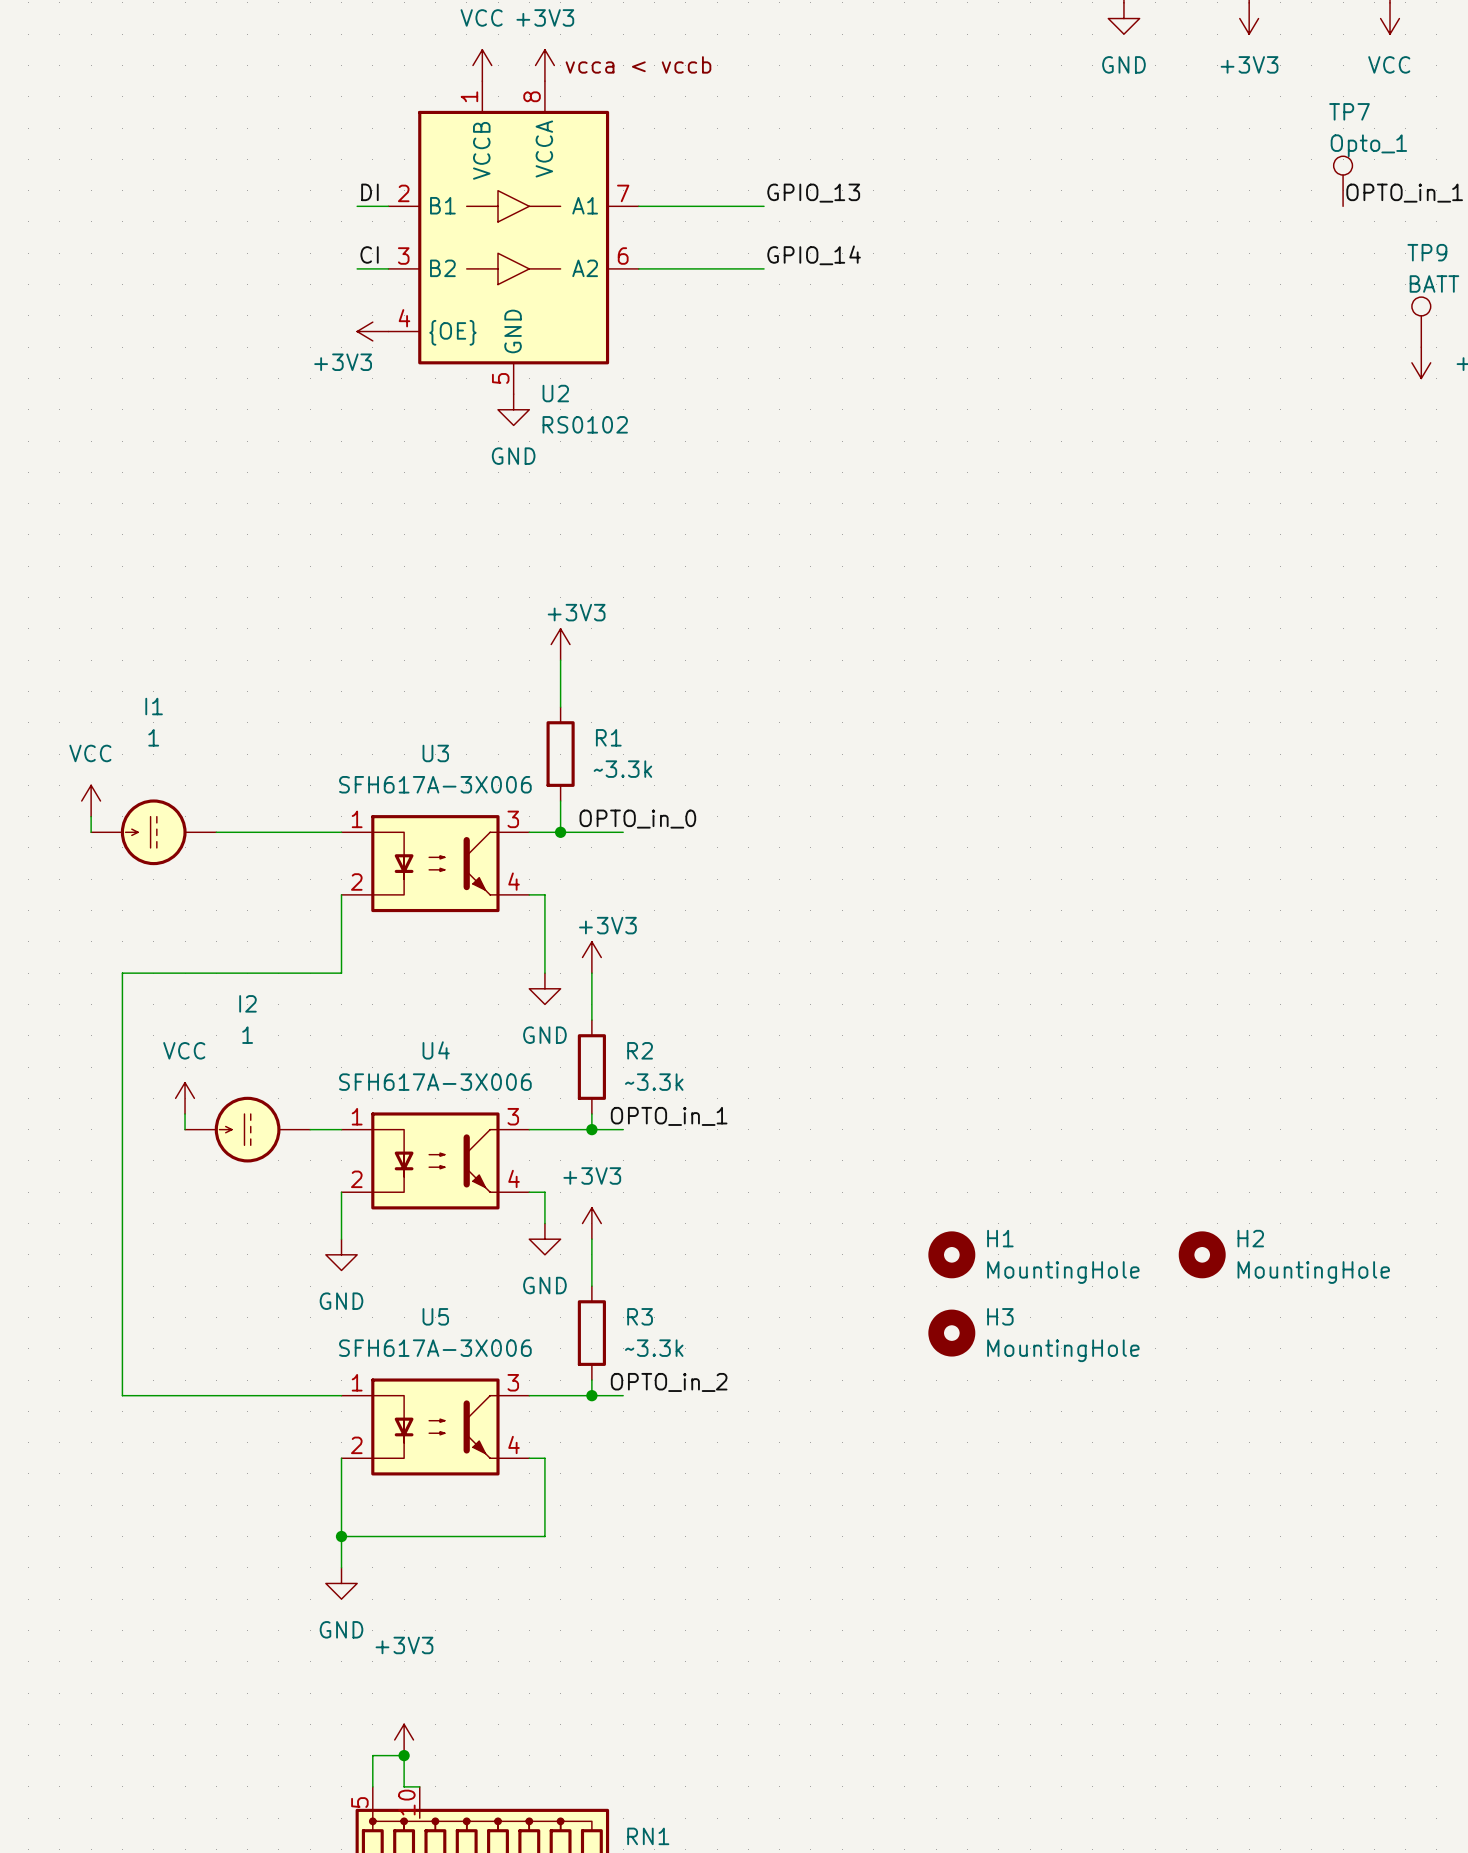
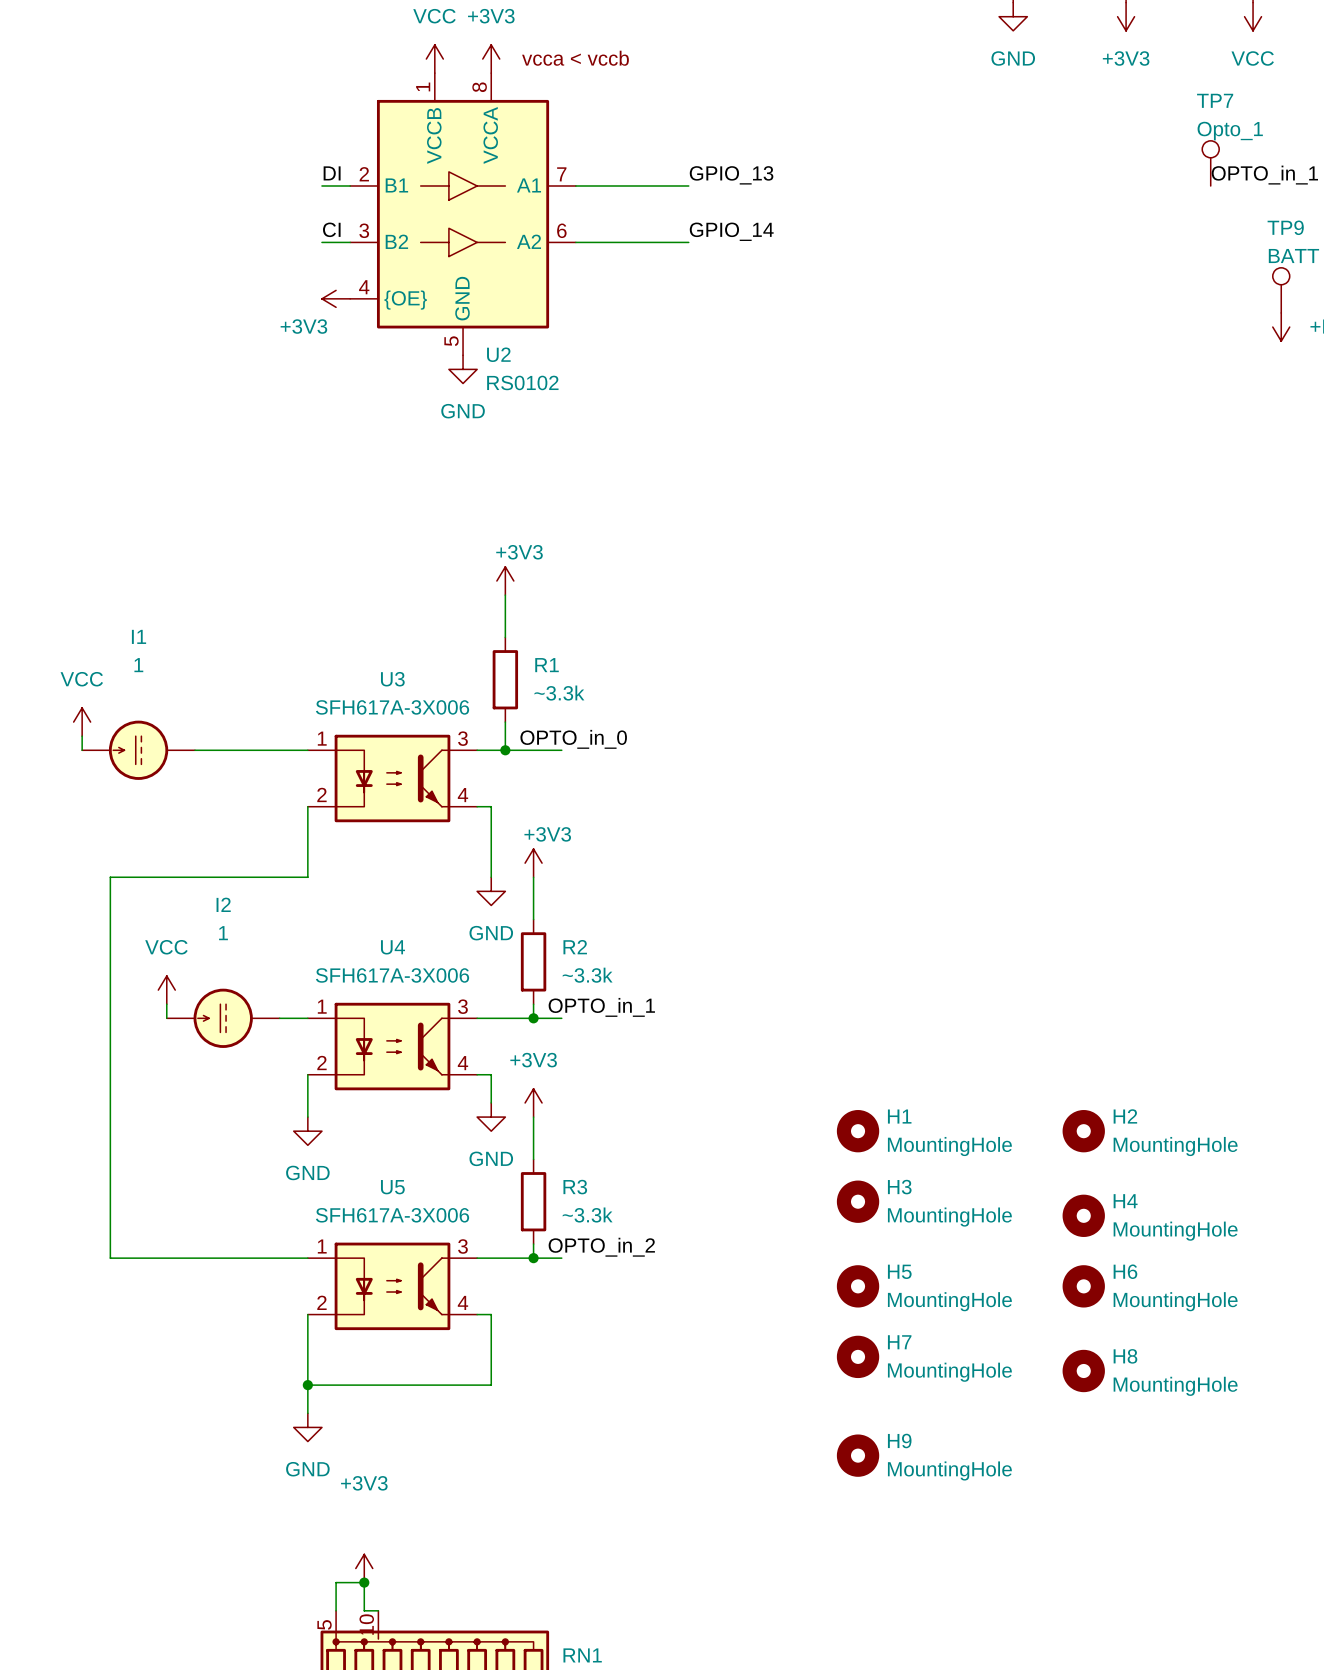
H4: none -> MountingHole (1083, 1215)
H5: none -> MountingHole (858, 1286)
H6: none -> MountingHole (1083, 1286)
H7: none -> MountingHole (858, 1356)
H8: none -> MountingHole (1083, 1371)
H9: none -> MountingHole (858, 1455)

